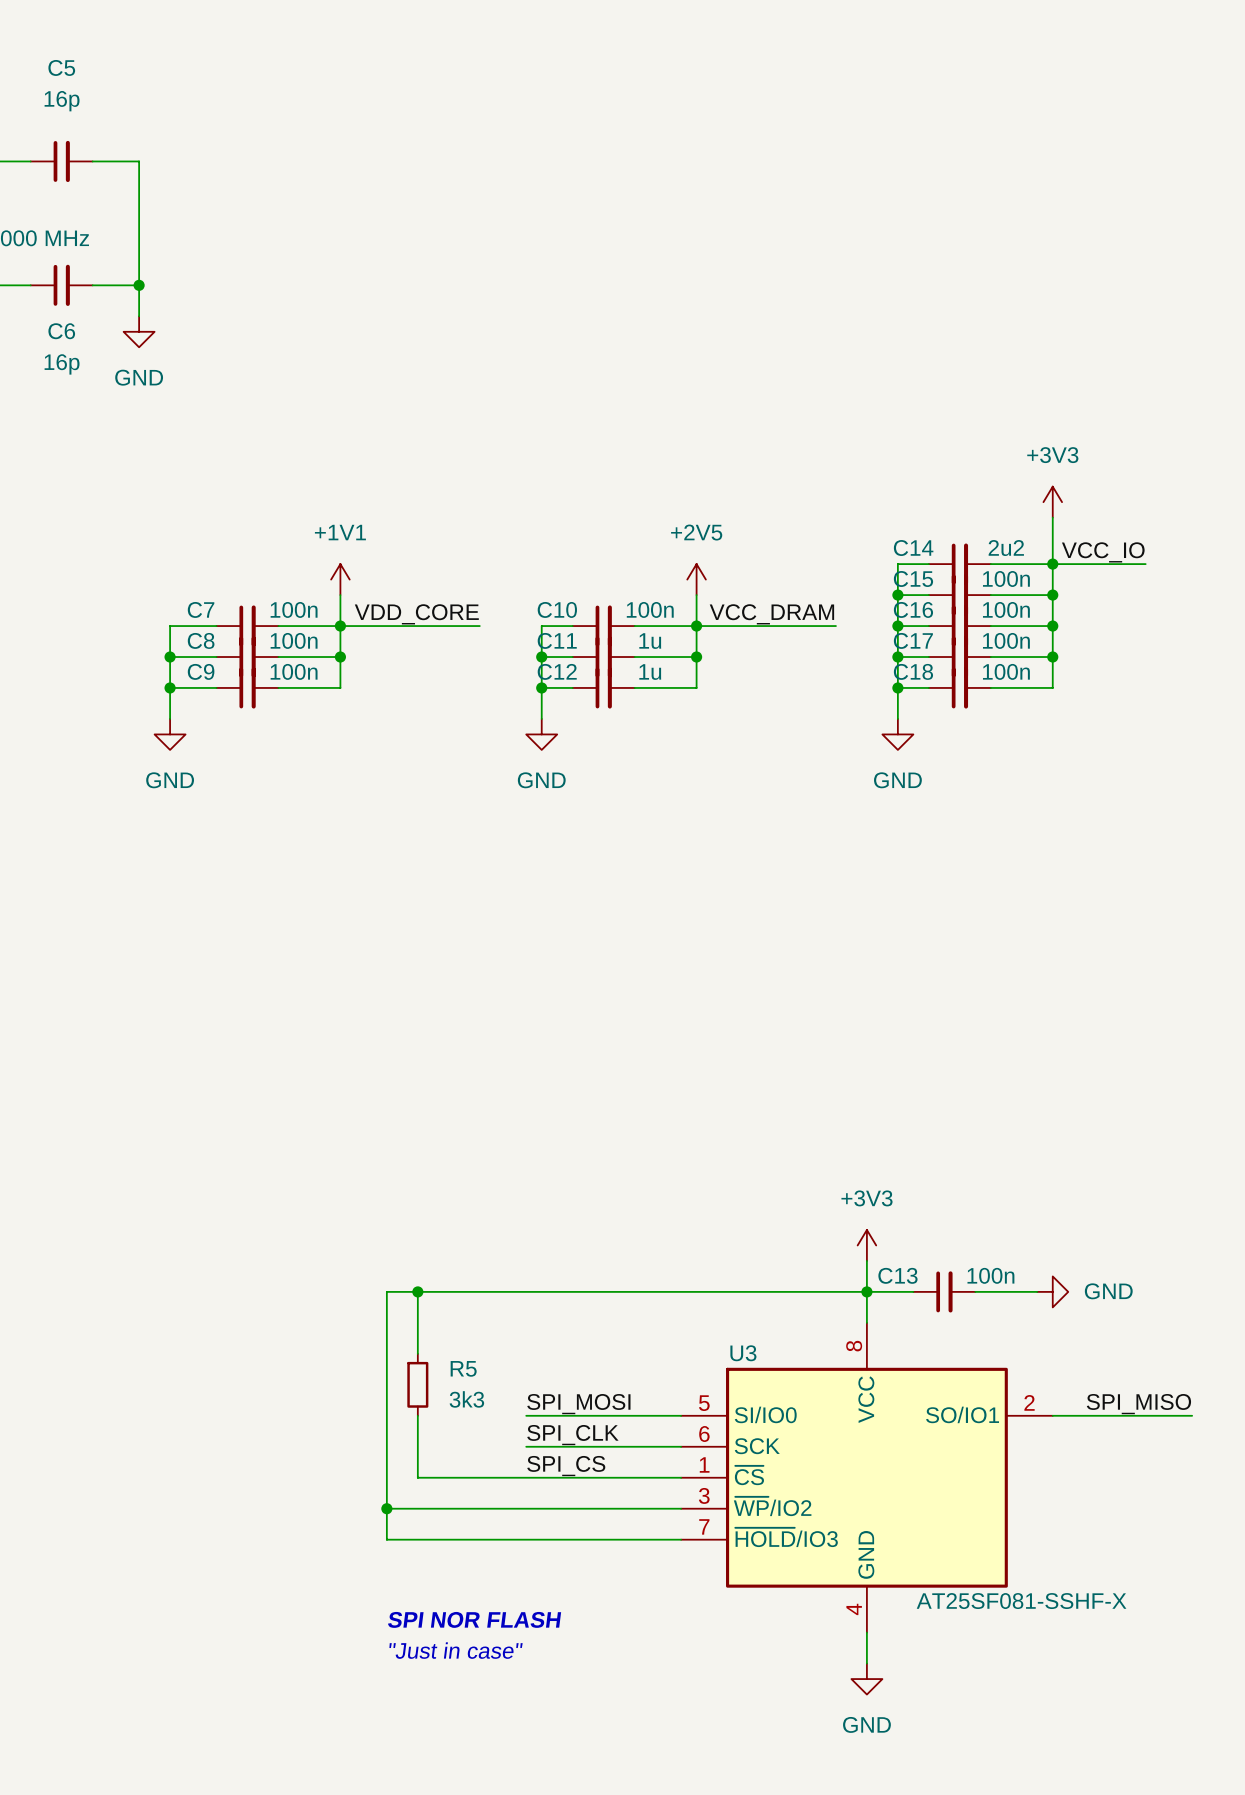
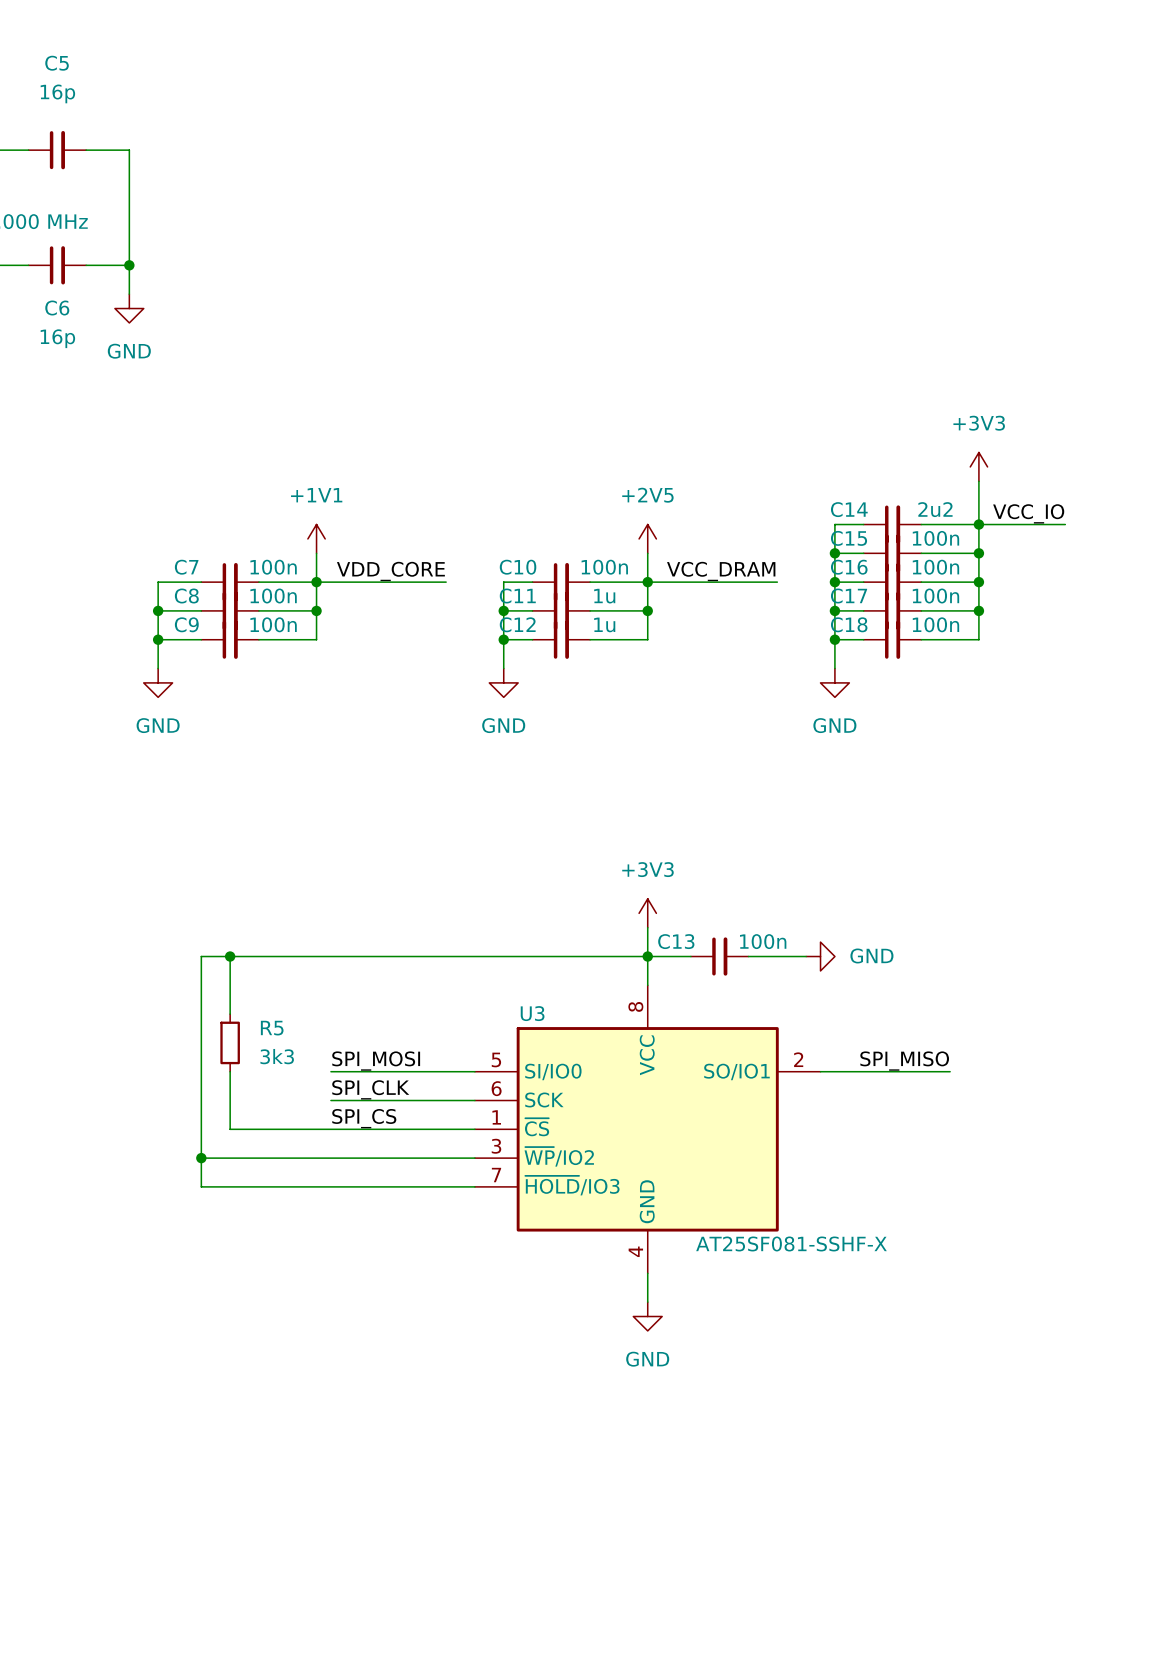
power symbol: none -> +3V3 (647, 913)
wire: none -> (647, 927) (647, 985)
wire: none -> (230, 956) (230, 1014)
junction: none -> (230, 956)
junction: none -> (647, 956)
wire: none -> (690, 956) (201, 956) (201, 1186) (474, 1186)
wire: none -> (748, 956) (806, 956)
power symbol: none -> GND (820, 956)
label: none -> SPI_MOSI (376, 1061)
label: none -> SPI_MISO (904, 1061)
wire: none -> (230, 1071) (230, 1129) (474, 1129)
wire: none -> (330, 1071) (474, 1071)
wire: none -> (820, 1071) (950, 1071)
label: none -> SPI_CLK (370, 1089)
label: none -> SPI_CS (364, 1118)
wire: none -> (201, 1158) (474, 1158)
junction: none -> (201, 1158)
power symbol: +3V3 (866, 1245) -> none
wire: (866, 1260) (866, 1322) -> none
wire: (417, 1291) (417, 1353) -> none
junction: (417, 1291) -> none
junction: (866, 1291) -> none
wire: (913, 1291) (386, 1291) (386, 1539) (681, 1539) -> none
C13 position: (944, 1291) -> (719, 956)
wire: (975, 1291) (1037, 1291) -> none
power symbol: GND (1052, 1291) -> none
wire: none -> (647, 1273) (647, 1302)
R5 position: (417, 1384) -> (230, 1042)
label: SPI_MOSI (578, 1404) -> none
label: SPI_MISO (1138, 1404) -> none
wire: (417, 1415) (417, 1477) (681, 1477) -> none
wire: (526, 1415) (681, 1415) -> (330, 1100) (474, 1100)
power symbol: none -> GND (647, 1316)
wire: (1052, 1415) (1192, 1415) -> none
label: SPI_CLK (572, 1435) -> none
wire: (526, 1446) (681, 1446) -> none
label: SPI_CS (566, 1466) -> none
U3 position: (866, 1477) -> (647, 1129)
wire: (386, 1508) (681, 1508) -> none
junction: (386, 1508) -> none
text: SPI NOR FLASH (474, 1619) -> none
wire: (866, 1632) (866, 1663) -> none
text: "Just in case" (456, 1650) -> none
power symbol: GND (866, 1679) -> none

